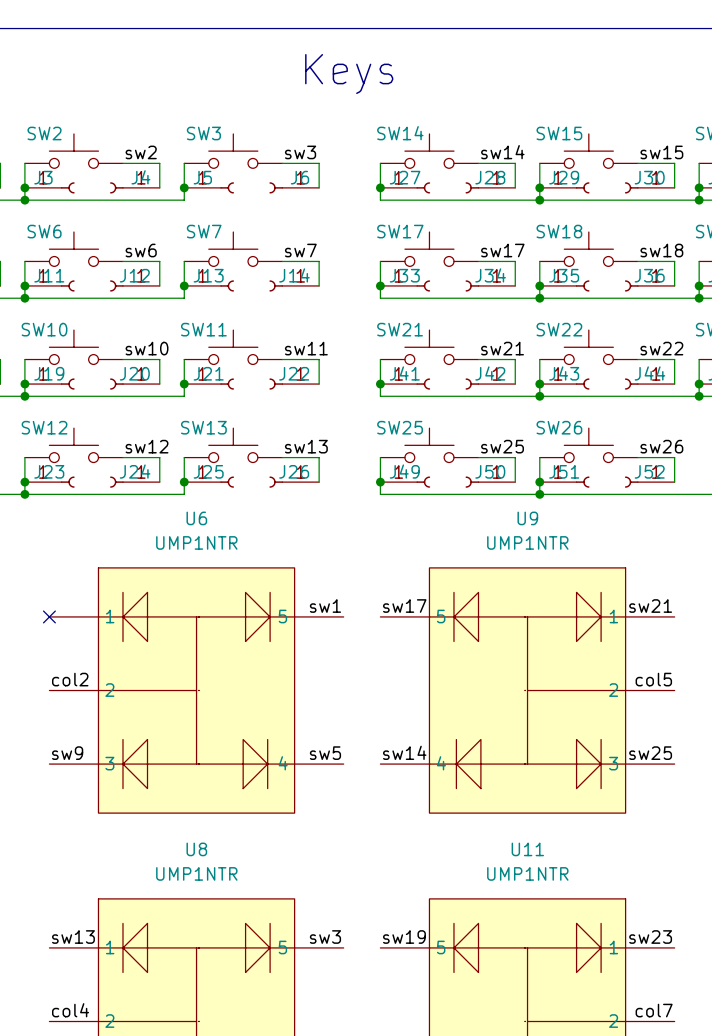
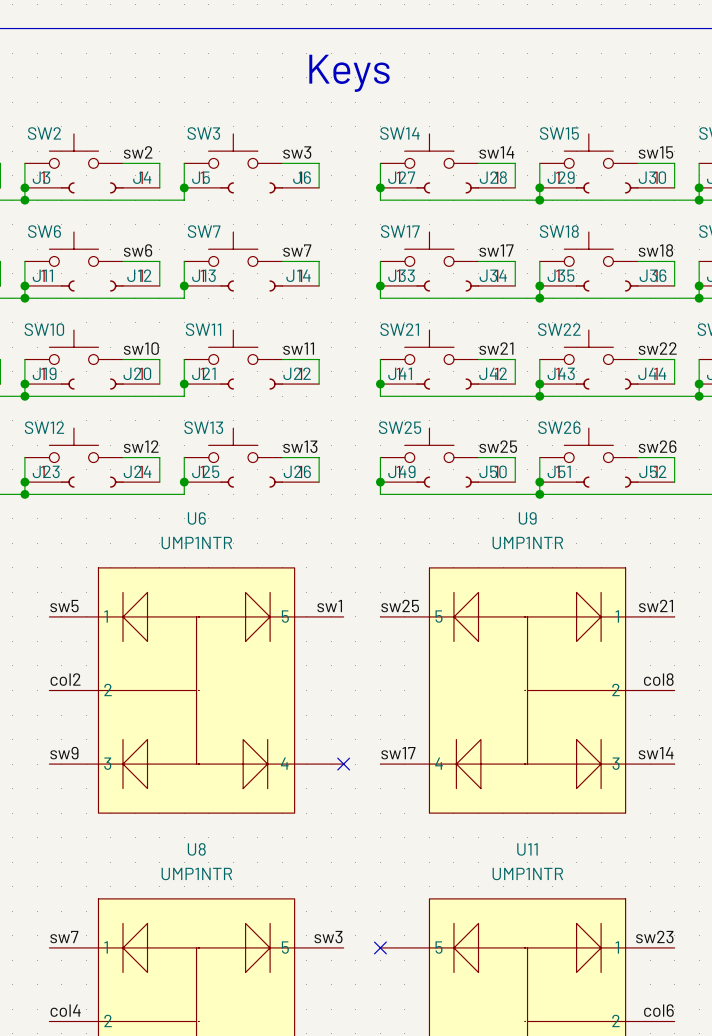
label: none -> sw5 (64, 606)
label: sw17 (404, 606) -> sw25 (400, 606)
no-connect mark: (49, 616) -> none
label: col5 (653, 679) -> col8 (658, 679)
label: sw14 (404, 752) -> sw17 (398, 753)
label: sw5 (325, 753) -> none
label: sw25 (650, 753) -> sw14 (656, 753)
no-connect mark: none -> (343, 764)
label: sw13 (73, 937) -> sw7 (64, 937)
label: sw19 (404, 937) -> none
no-connect mark: none -> (380, 947)
label: col7 (654, 1010) -> col6 (658, 1010)

